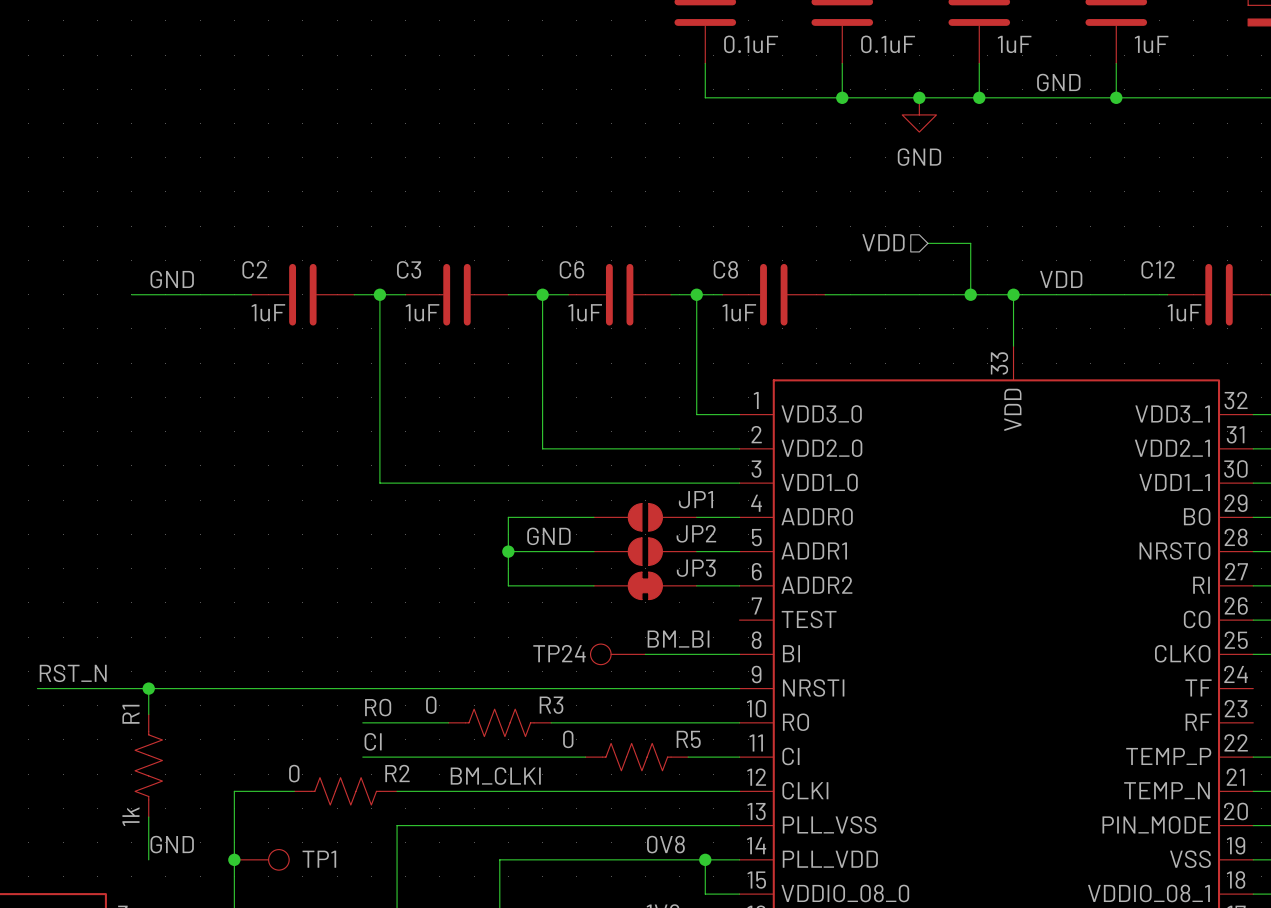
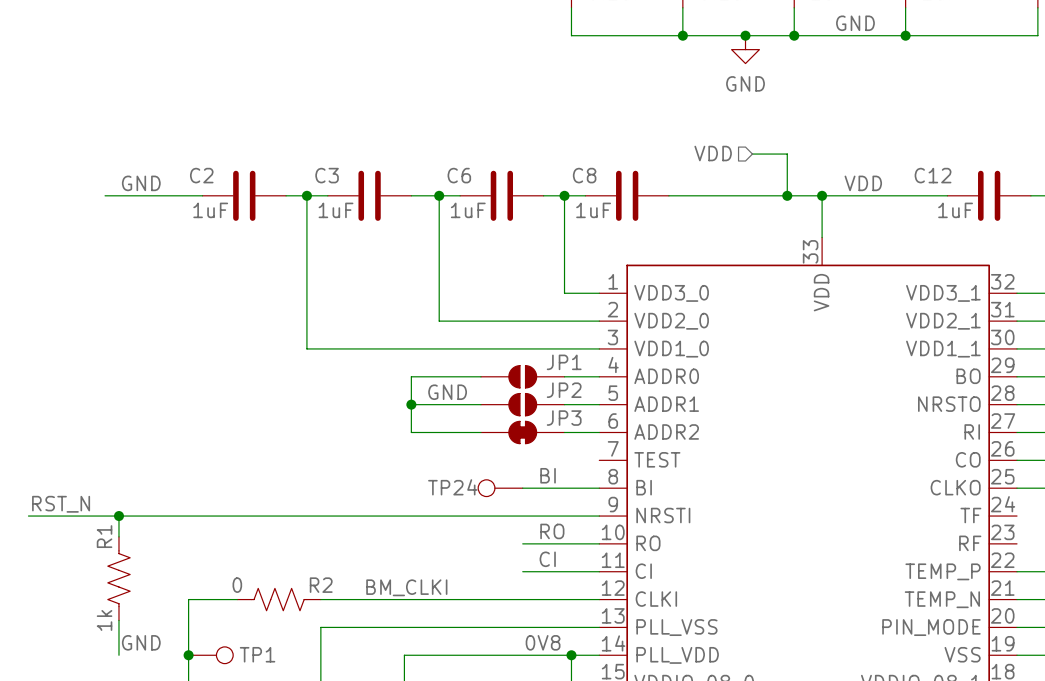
label: none -> BI (548, 475)
label: BM_BI (678, 639) -> none
label position: RO (378, 707) -> RO (552, 531)
wire: (362, 722) (448, 722) -> none
R3: 0 (499, 722) -> none
wire: (551, 722) (645, 722) -> none
label position: CI (373, 741) -> CI (547, 559)
wire: (362, 757) (585, 757) -> none
R5: 0 (636, 757) -> none

